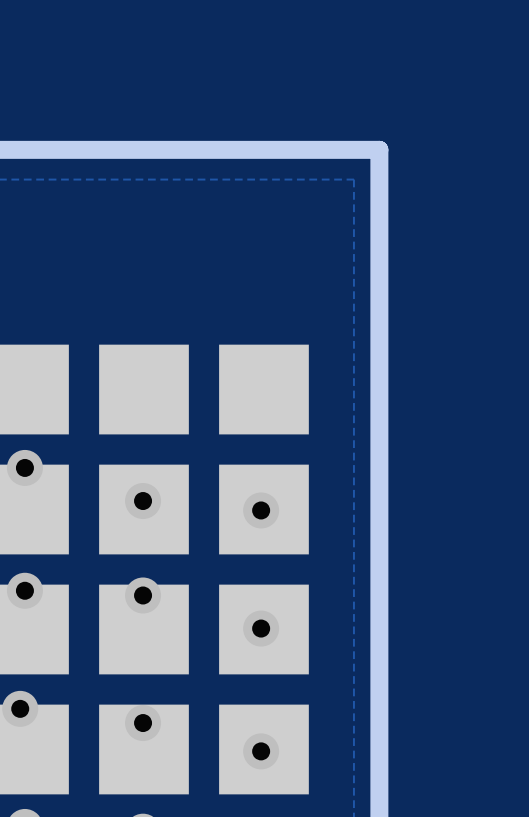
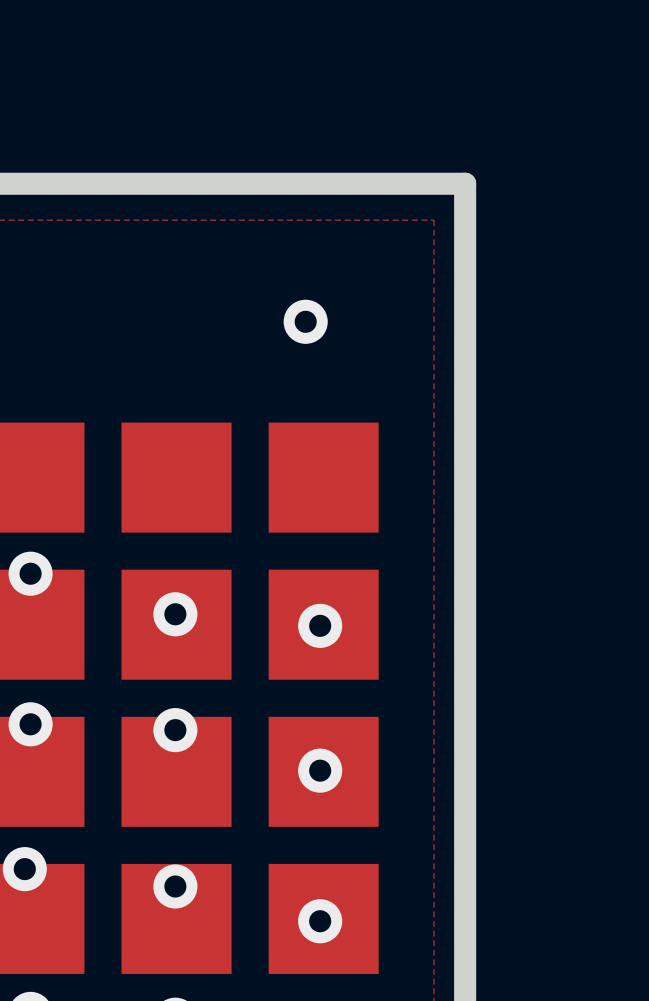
via: none -> (305, 321)

